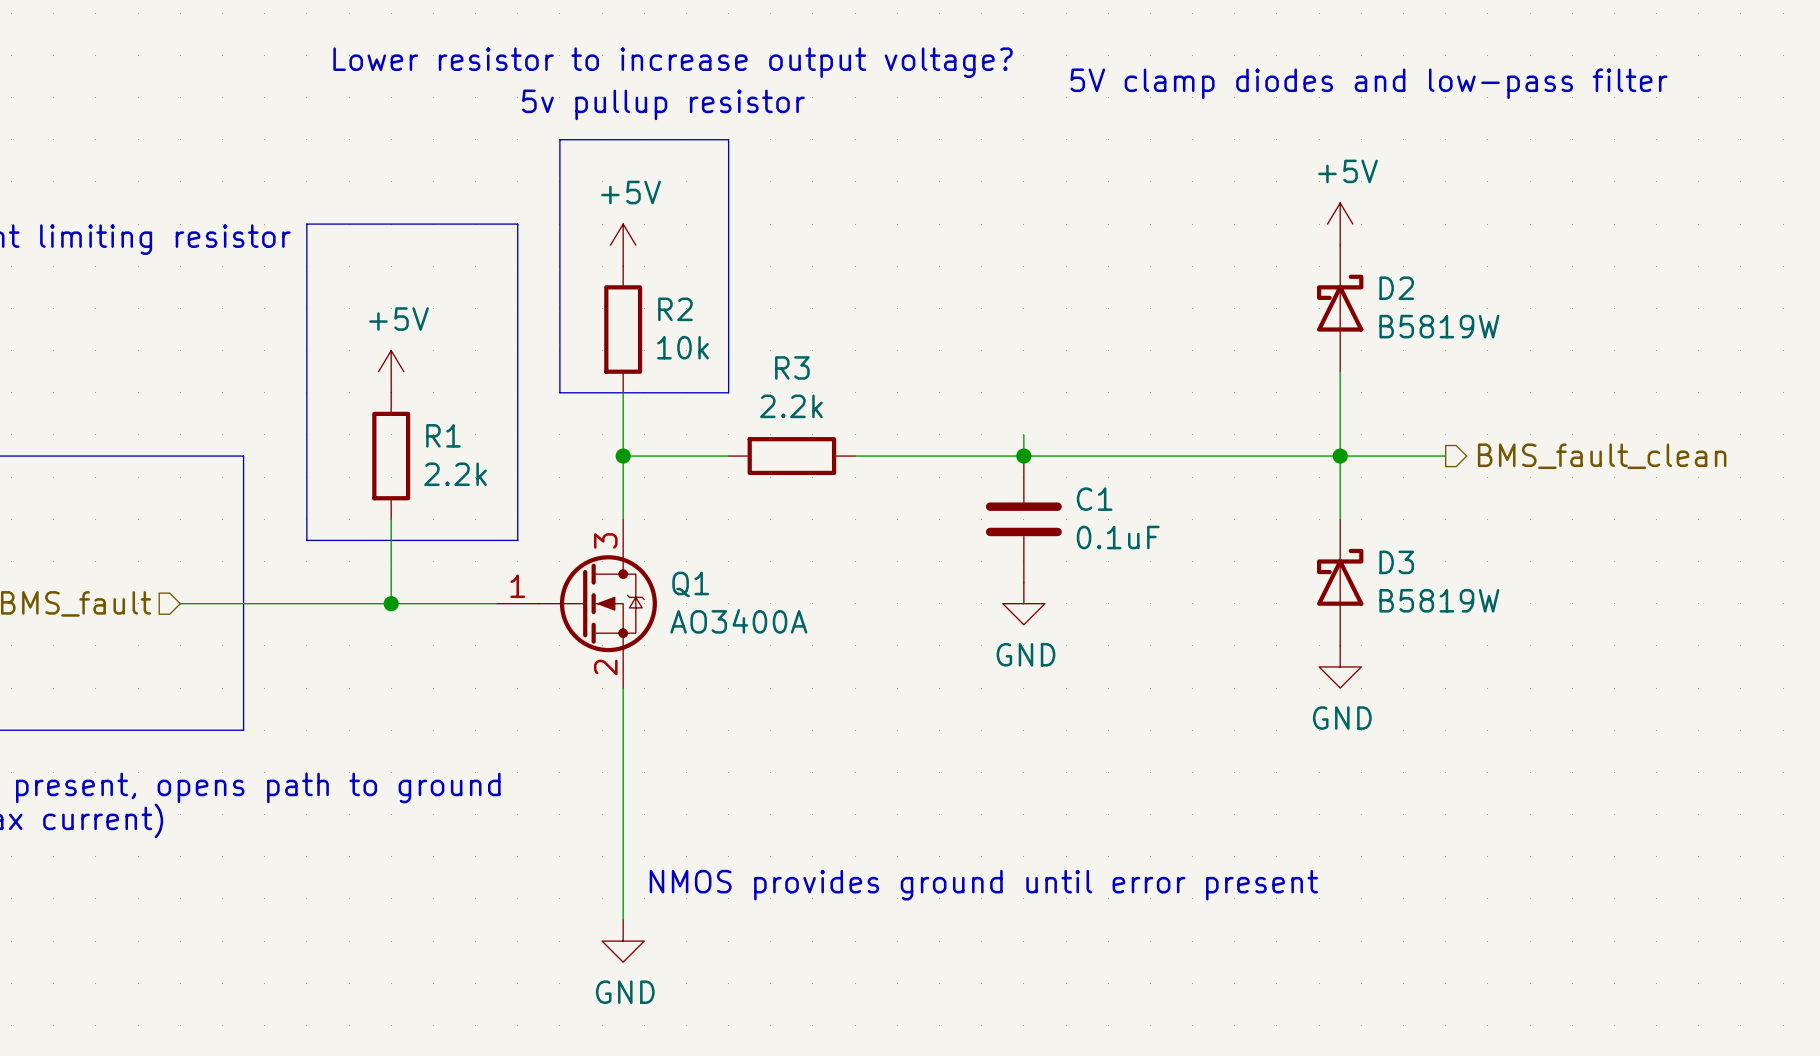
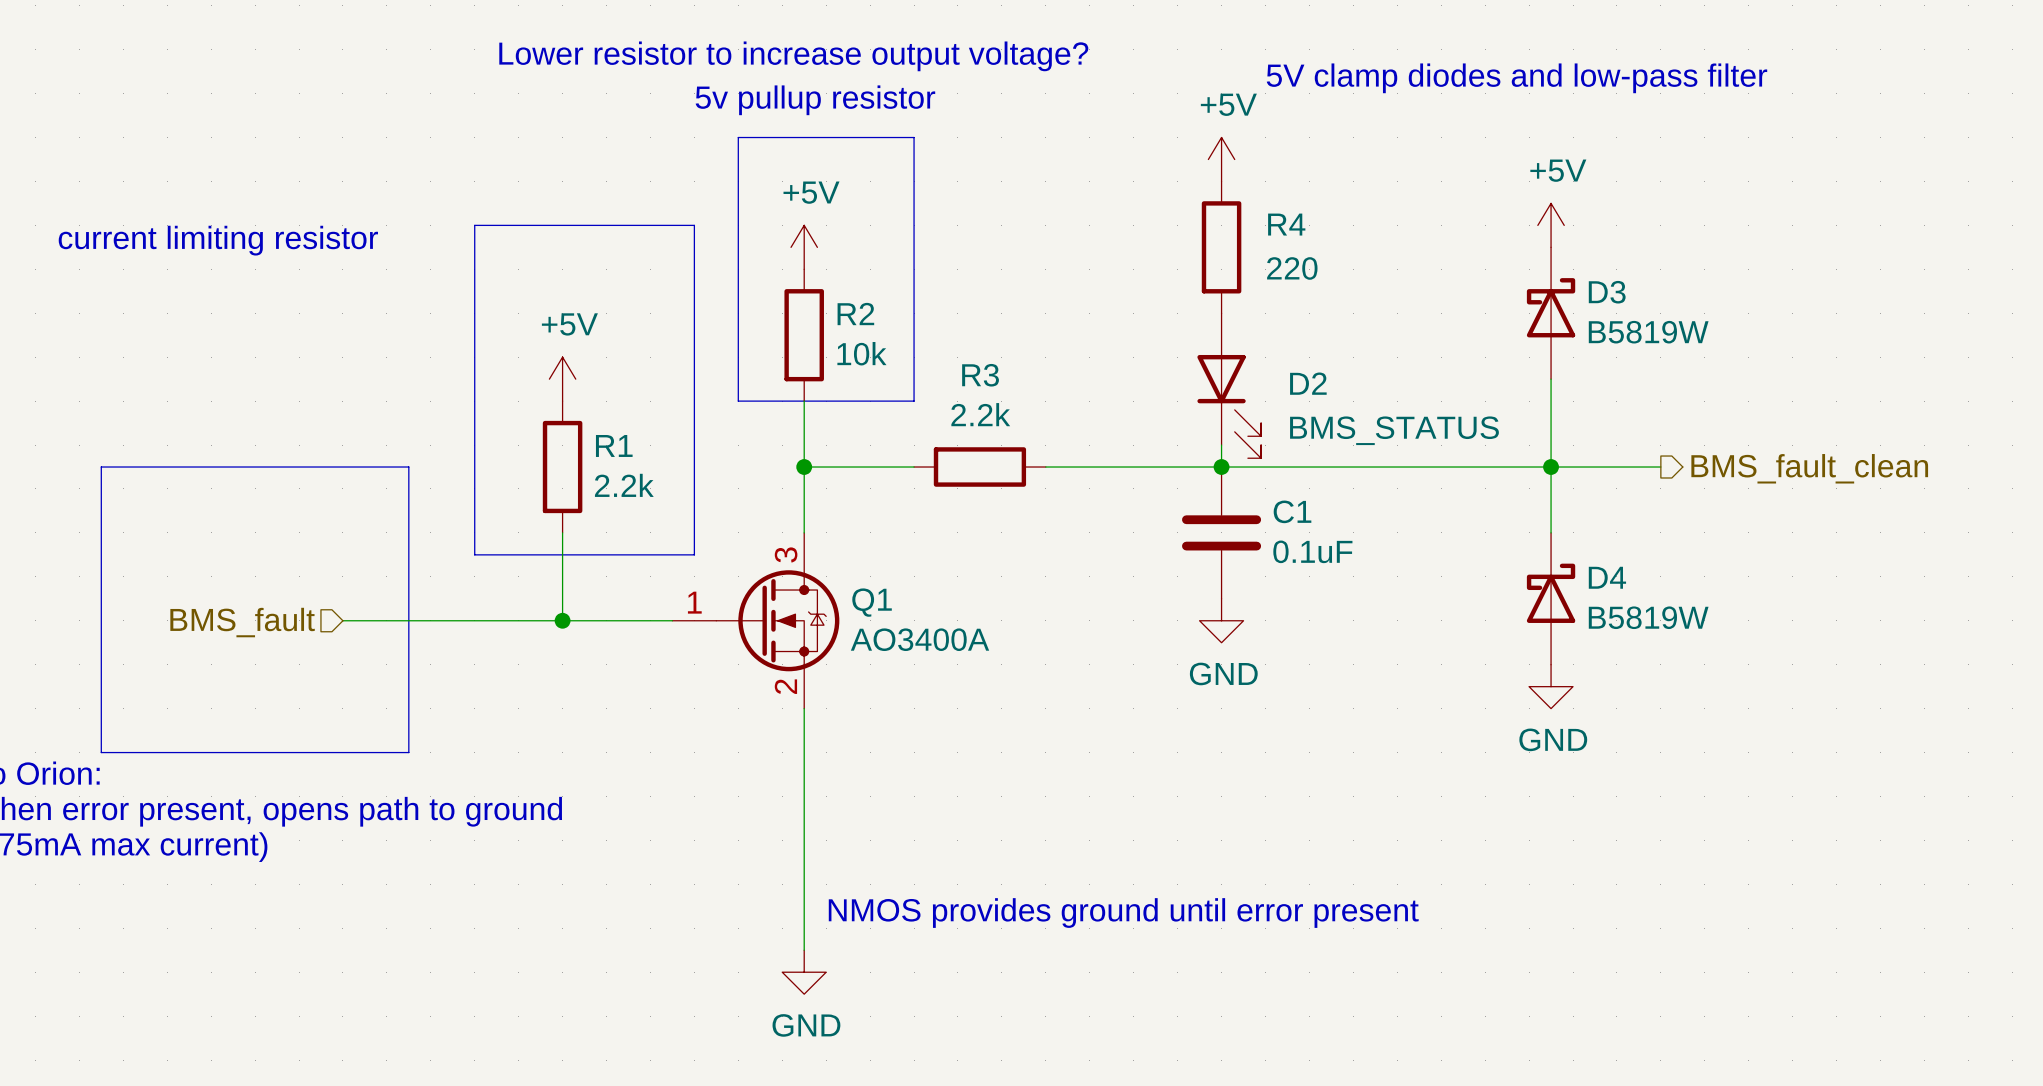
power symbol: none -> +5V (1221, 159)
R4: none -> 220 (1221, 247)
D2 name: D2 (1396, 288) -> D3 (1607, 292)
D2: none -> BMS_STATUS (1229, 385)
D3 name: D3 (1396, 562) -> D4 (1607, 577)

